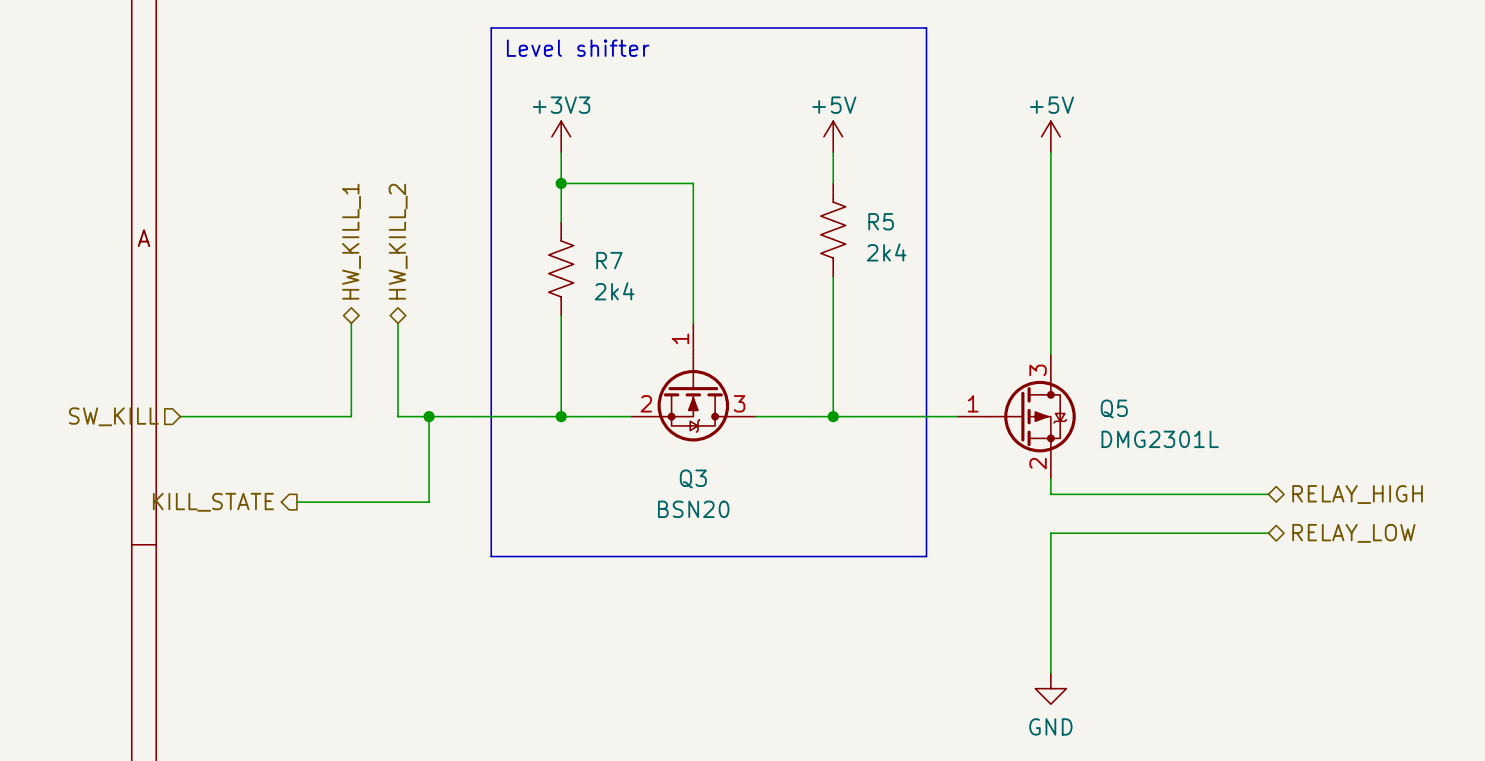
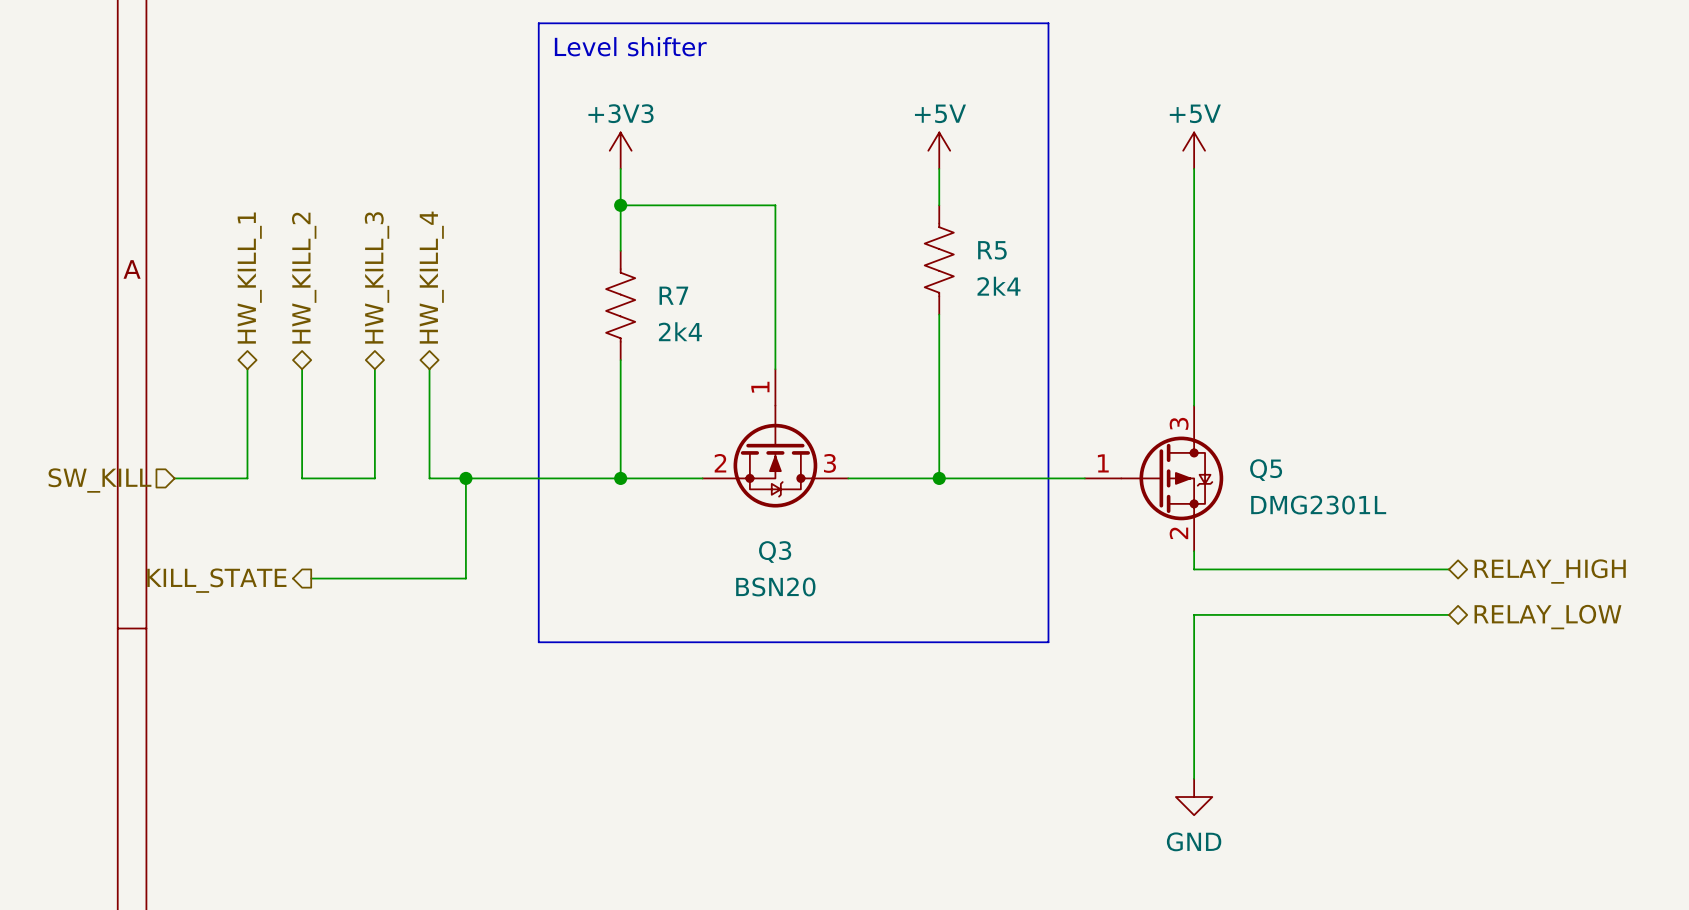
hierarchical label: none -> HW_KILL_1 (249, 278)
hierarchical label: none -> HW_KILL_2 (304, 278)
hierarchical label: HW_KILL_1 (351, 241) -> HW_KILL_3 (377, 277)
hierarchical label: HW_KILL_2 (398, 241) -> HW_KILL_4 (431, 277)
wire: none -> (302, 369) (302, 478)
wire: (242, 416) (289, 416) -> (247, 478) (247, 369)

